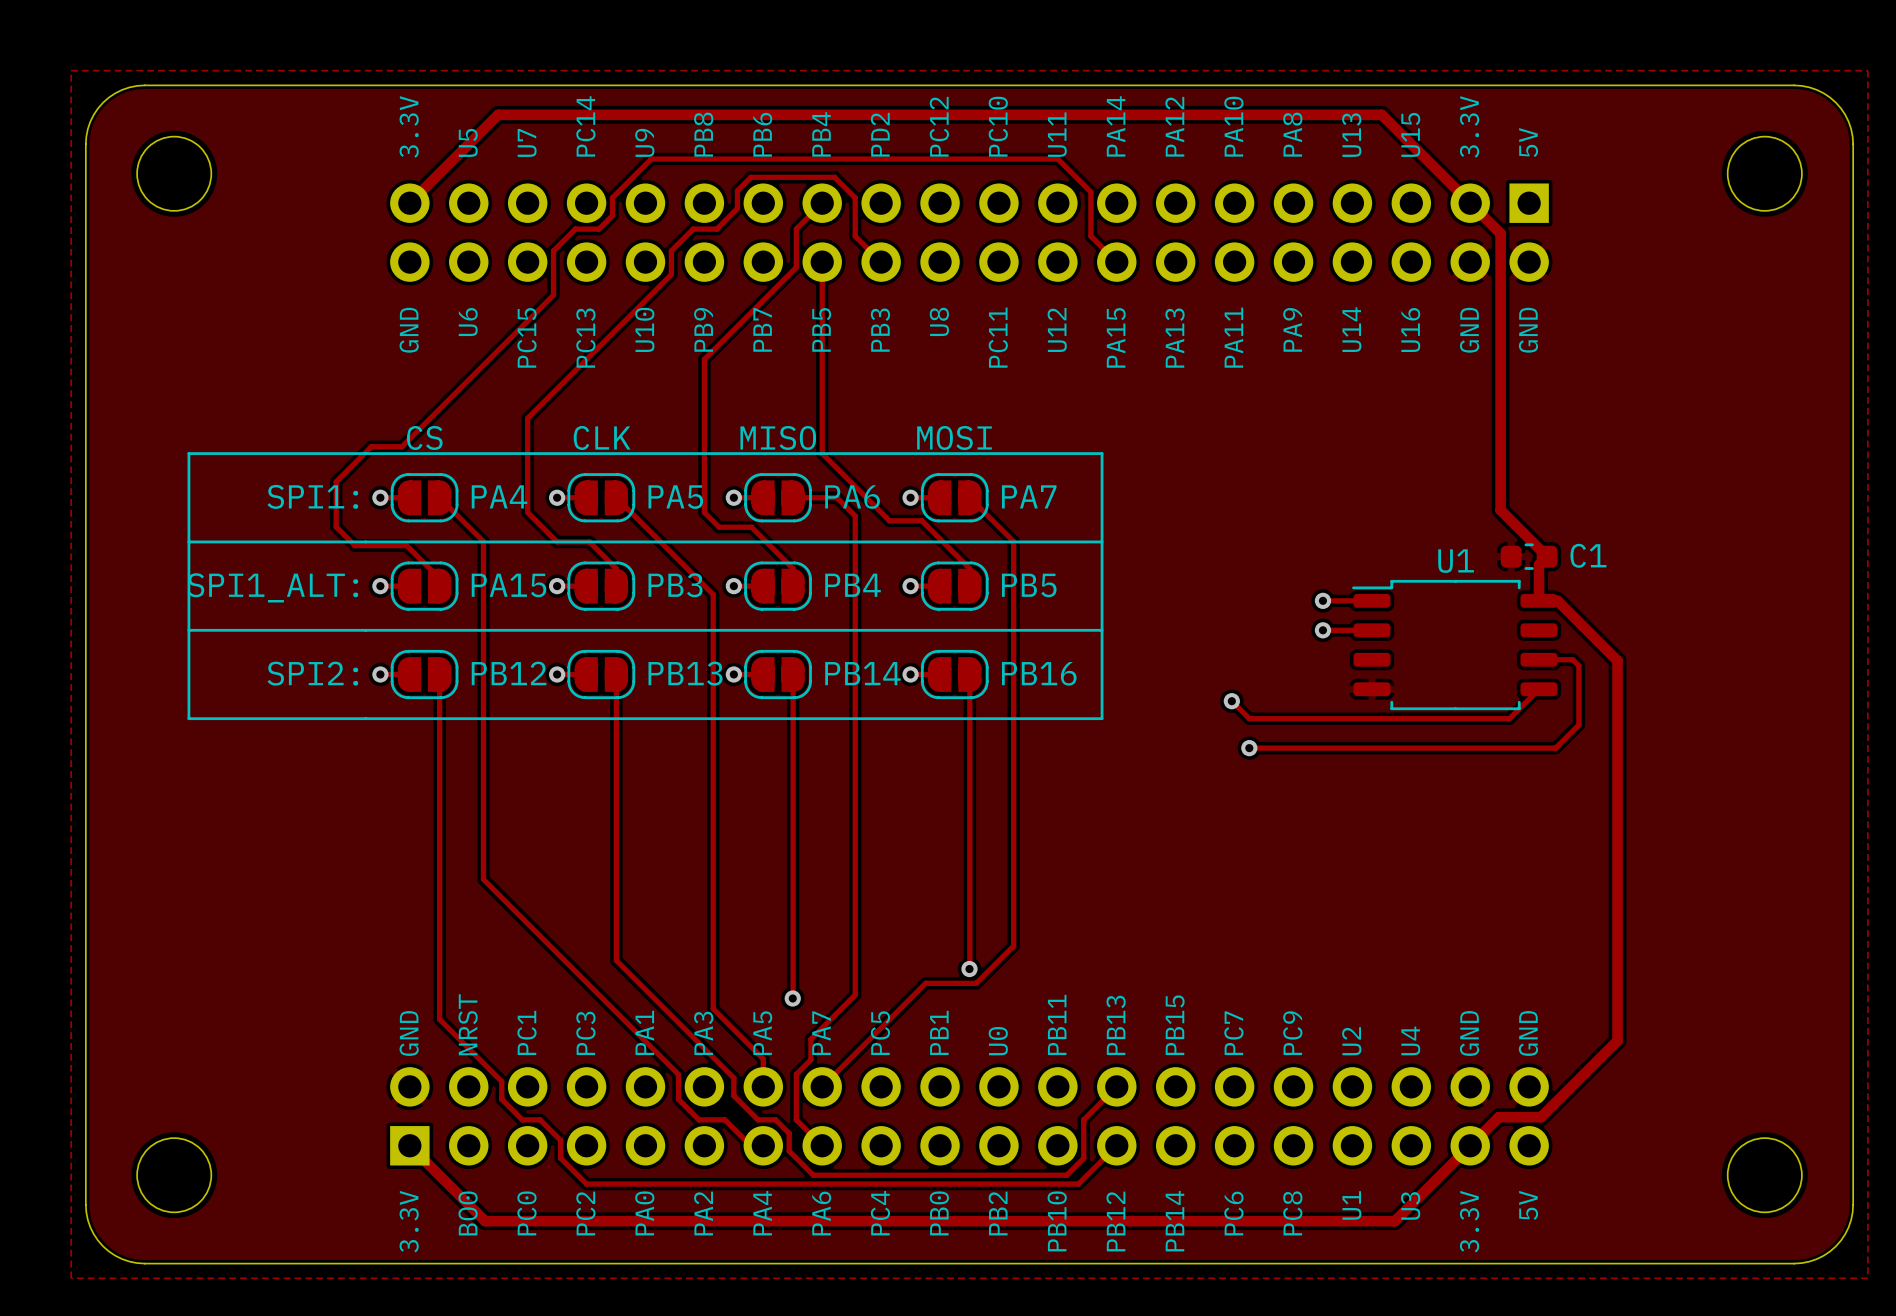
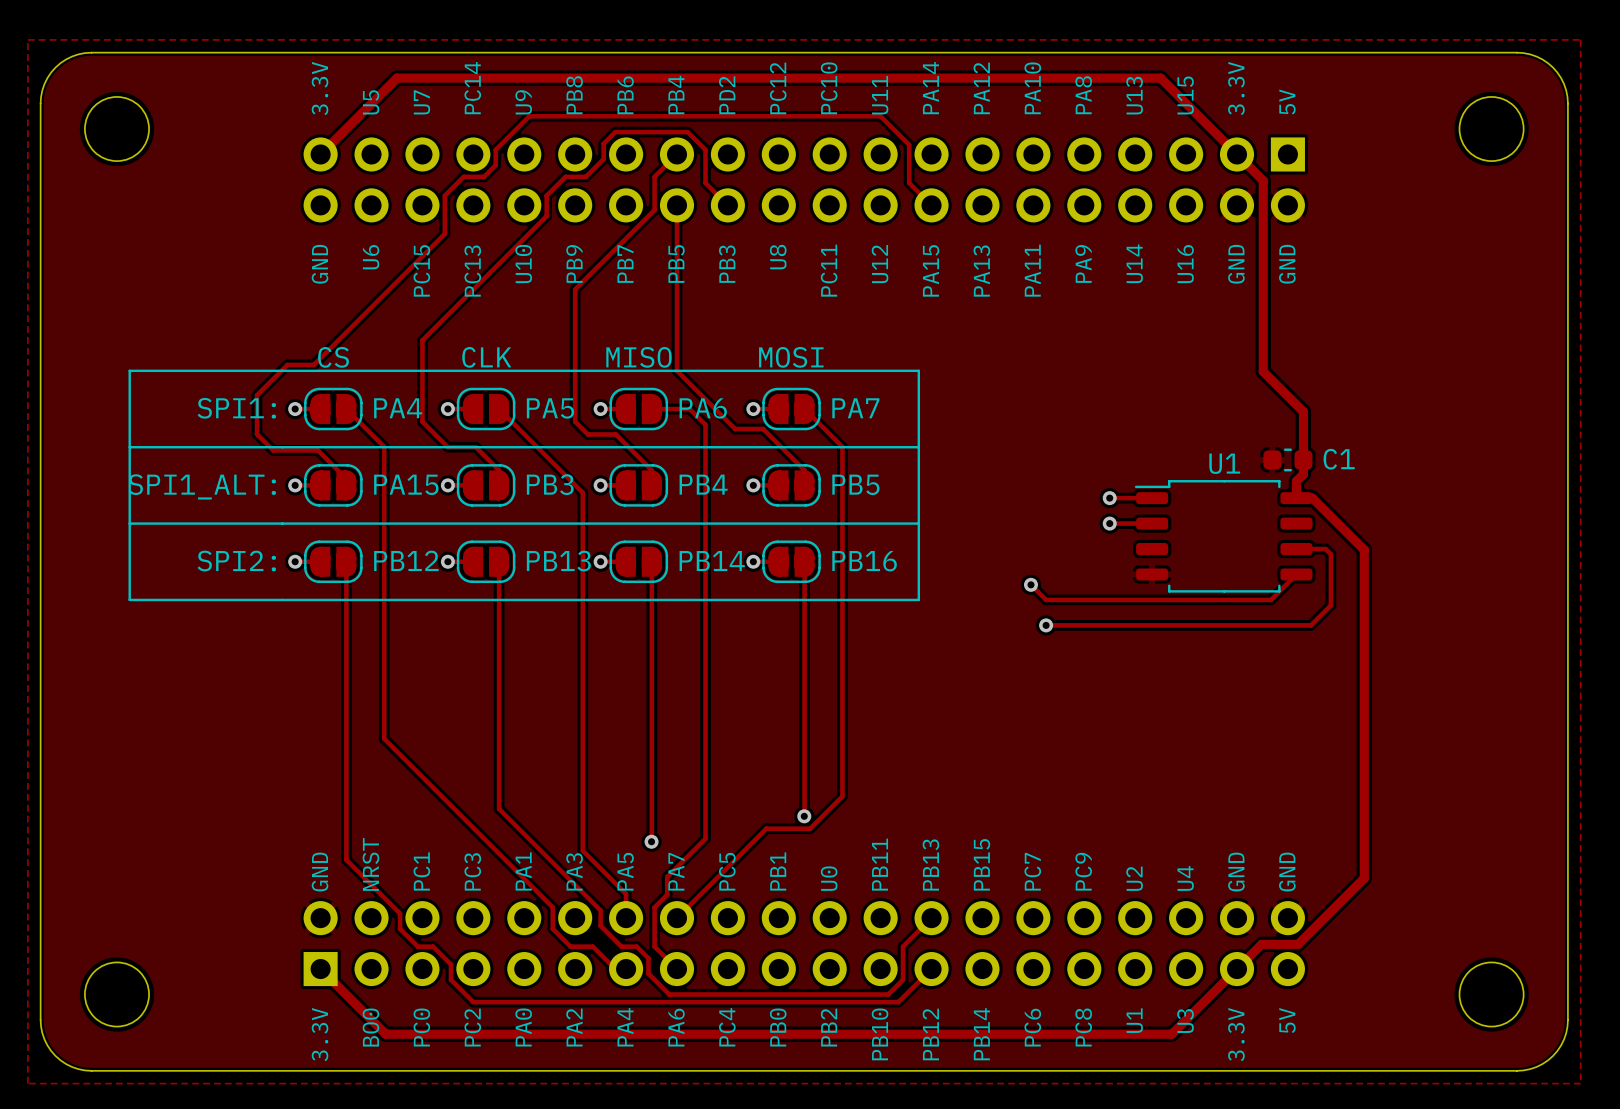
track: (1500, 454) (1500, 510) (1547, 556) (1539, 564) (1539, 581) -> (1263, 371) (1303, 411) (1303, 474) (1296, 481)

